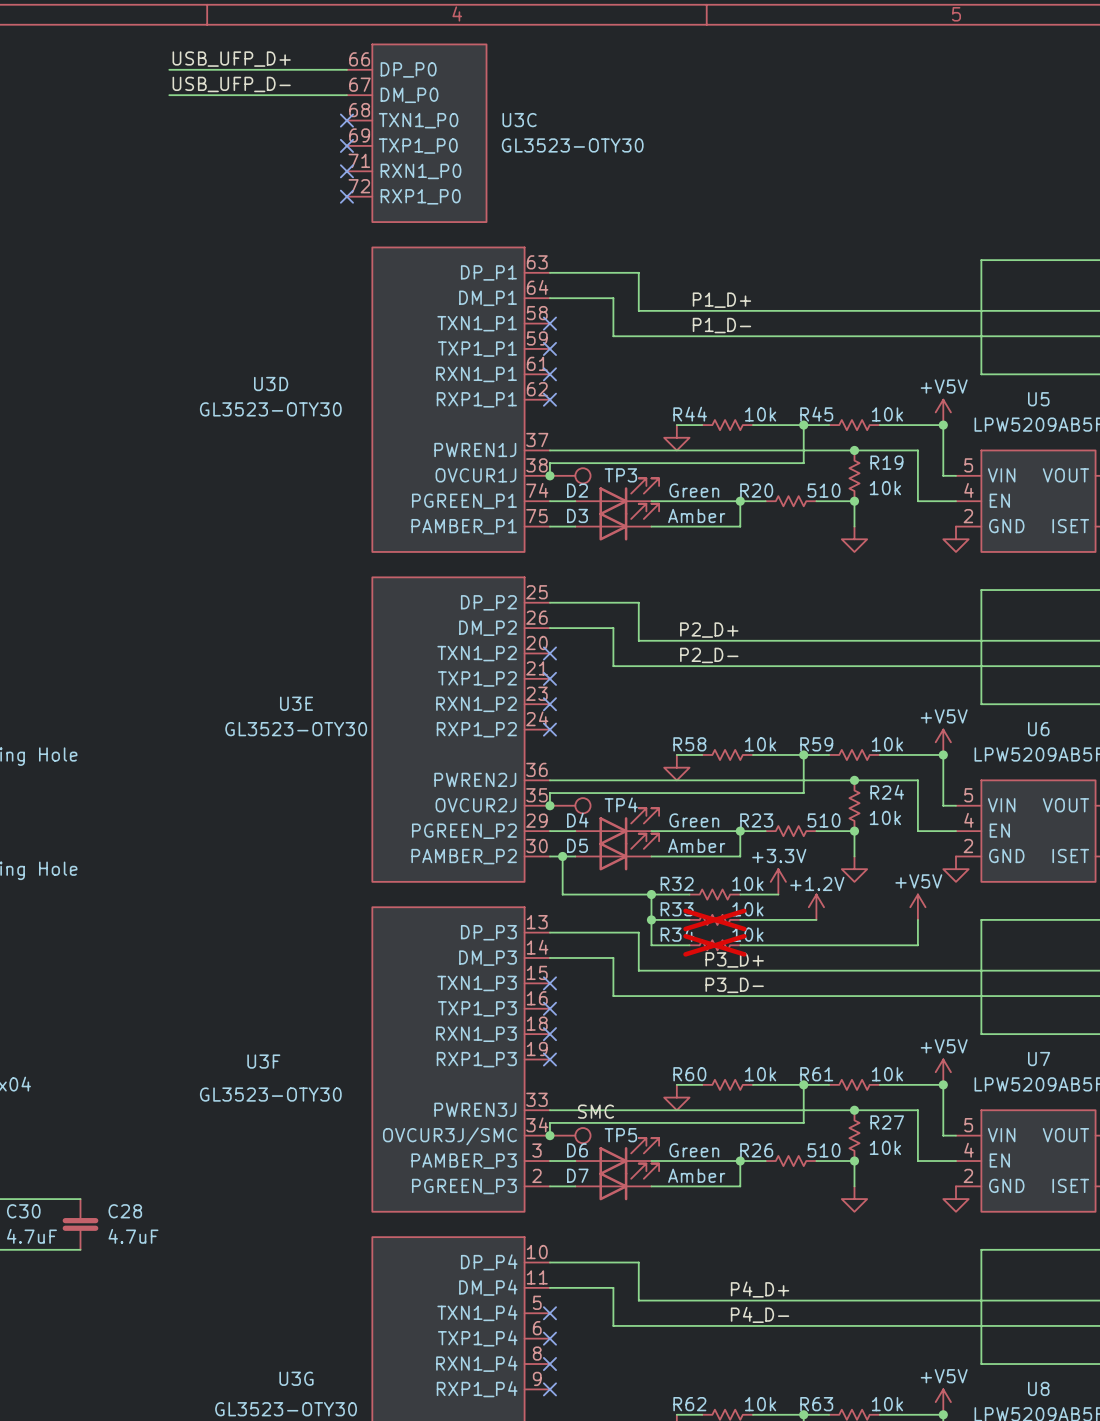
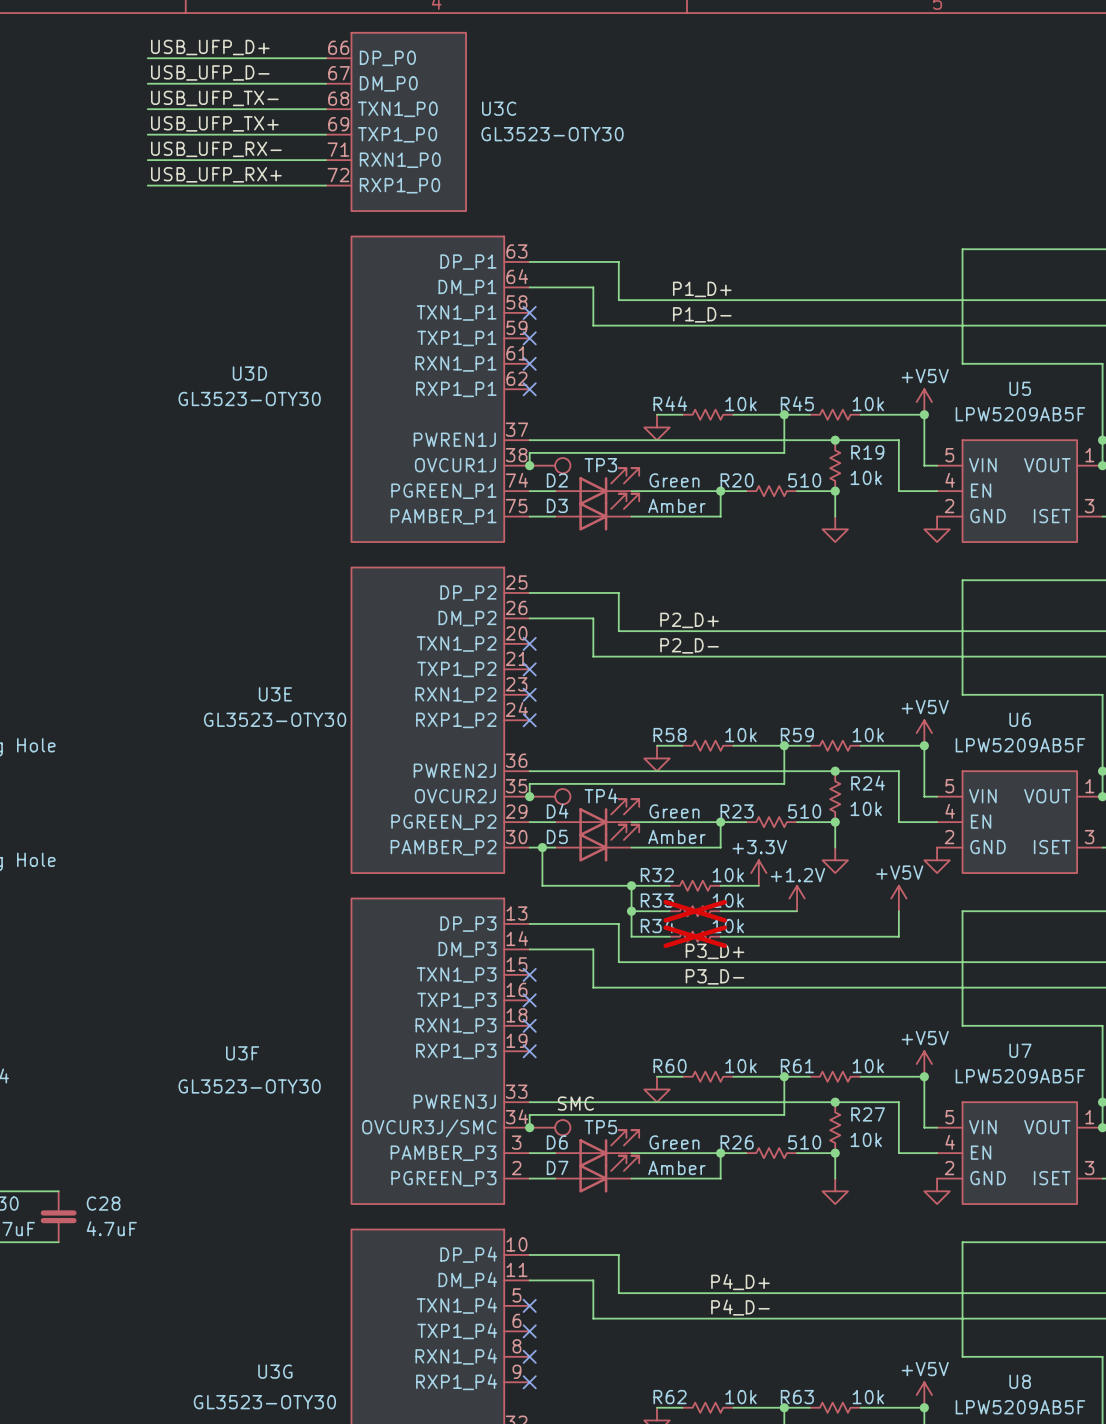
label: none -> USB_UFP_TX- (214, 98)
wire: none -> (147, 109) (325, 109)
no-connect mark: (346, 120) -> none
label: none -> USB_UFP_TX+ (214, 123)
wire: none -> (147, 134) (325, 134)
no-connect mark: (346, 145) -> none
label: none -> USB_UFP_RX- (216, 149)
wire: none -> (147, 160) (325, 160)
no-connect mark: (346, 171) -> none
label: none -> USB_UFP_RX+ (216, 174)
wire: none -> (147, 185) (325, 185)
no-connect mark: (346, 196) -> none

